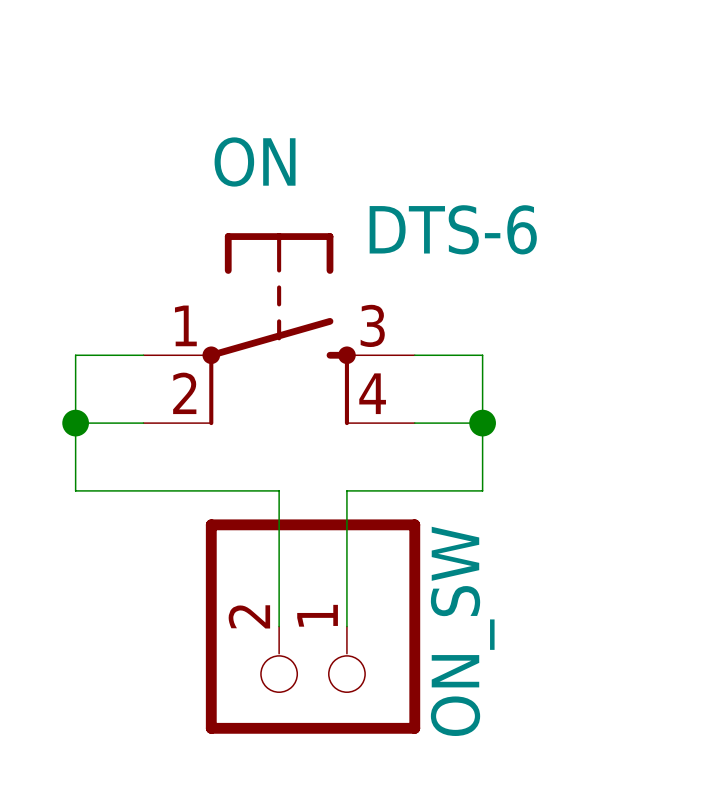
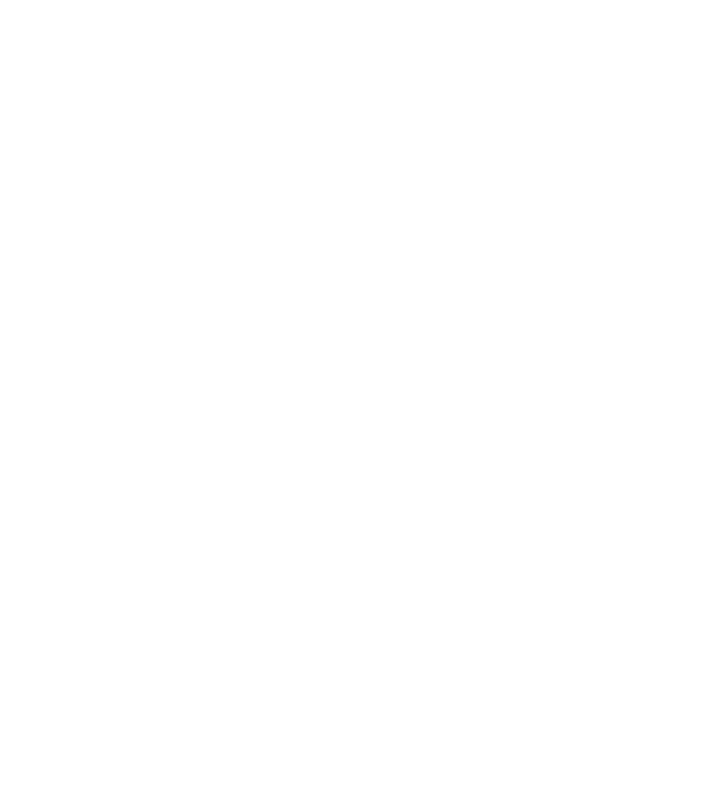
ON: DTS-6 (279, 329) -> none
wire: (143, 355) (75, 355) (75, 490) (279, 490) (279, 626) -> none
wire: (414, 355) (482, 355) (482, 490) (346, 490) (346, 626) -> none
wire: (75, 423) (143, 423) -> none
junction: (75, 423) -> none
wire: (414, 423) (482, 423) -> none
junction: (482, 423) -> none
ON_SW: (313, 626) -> none

